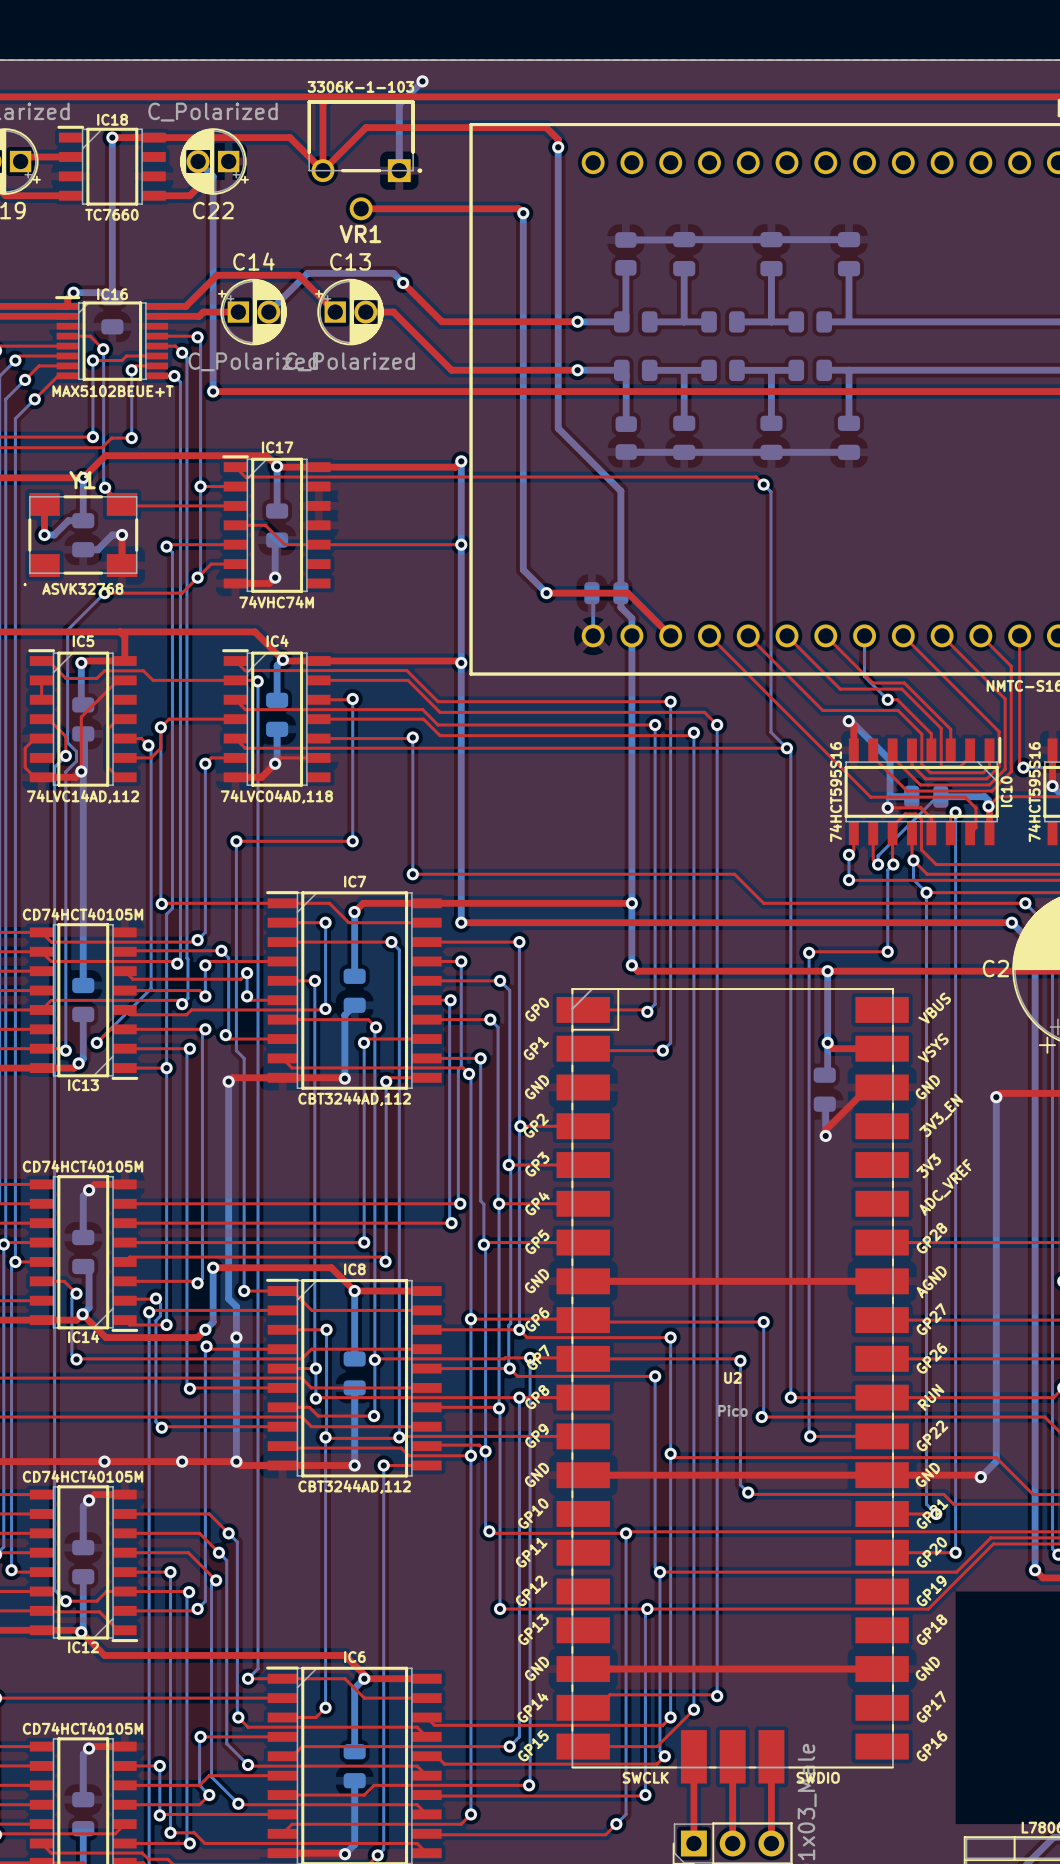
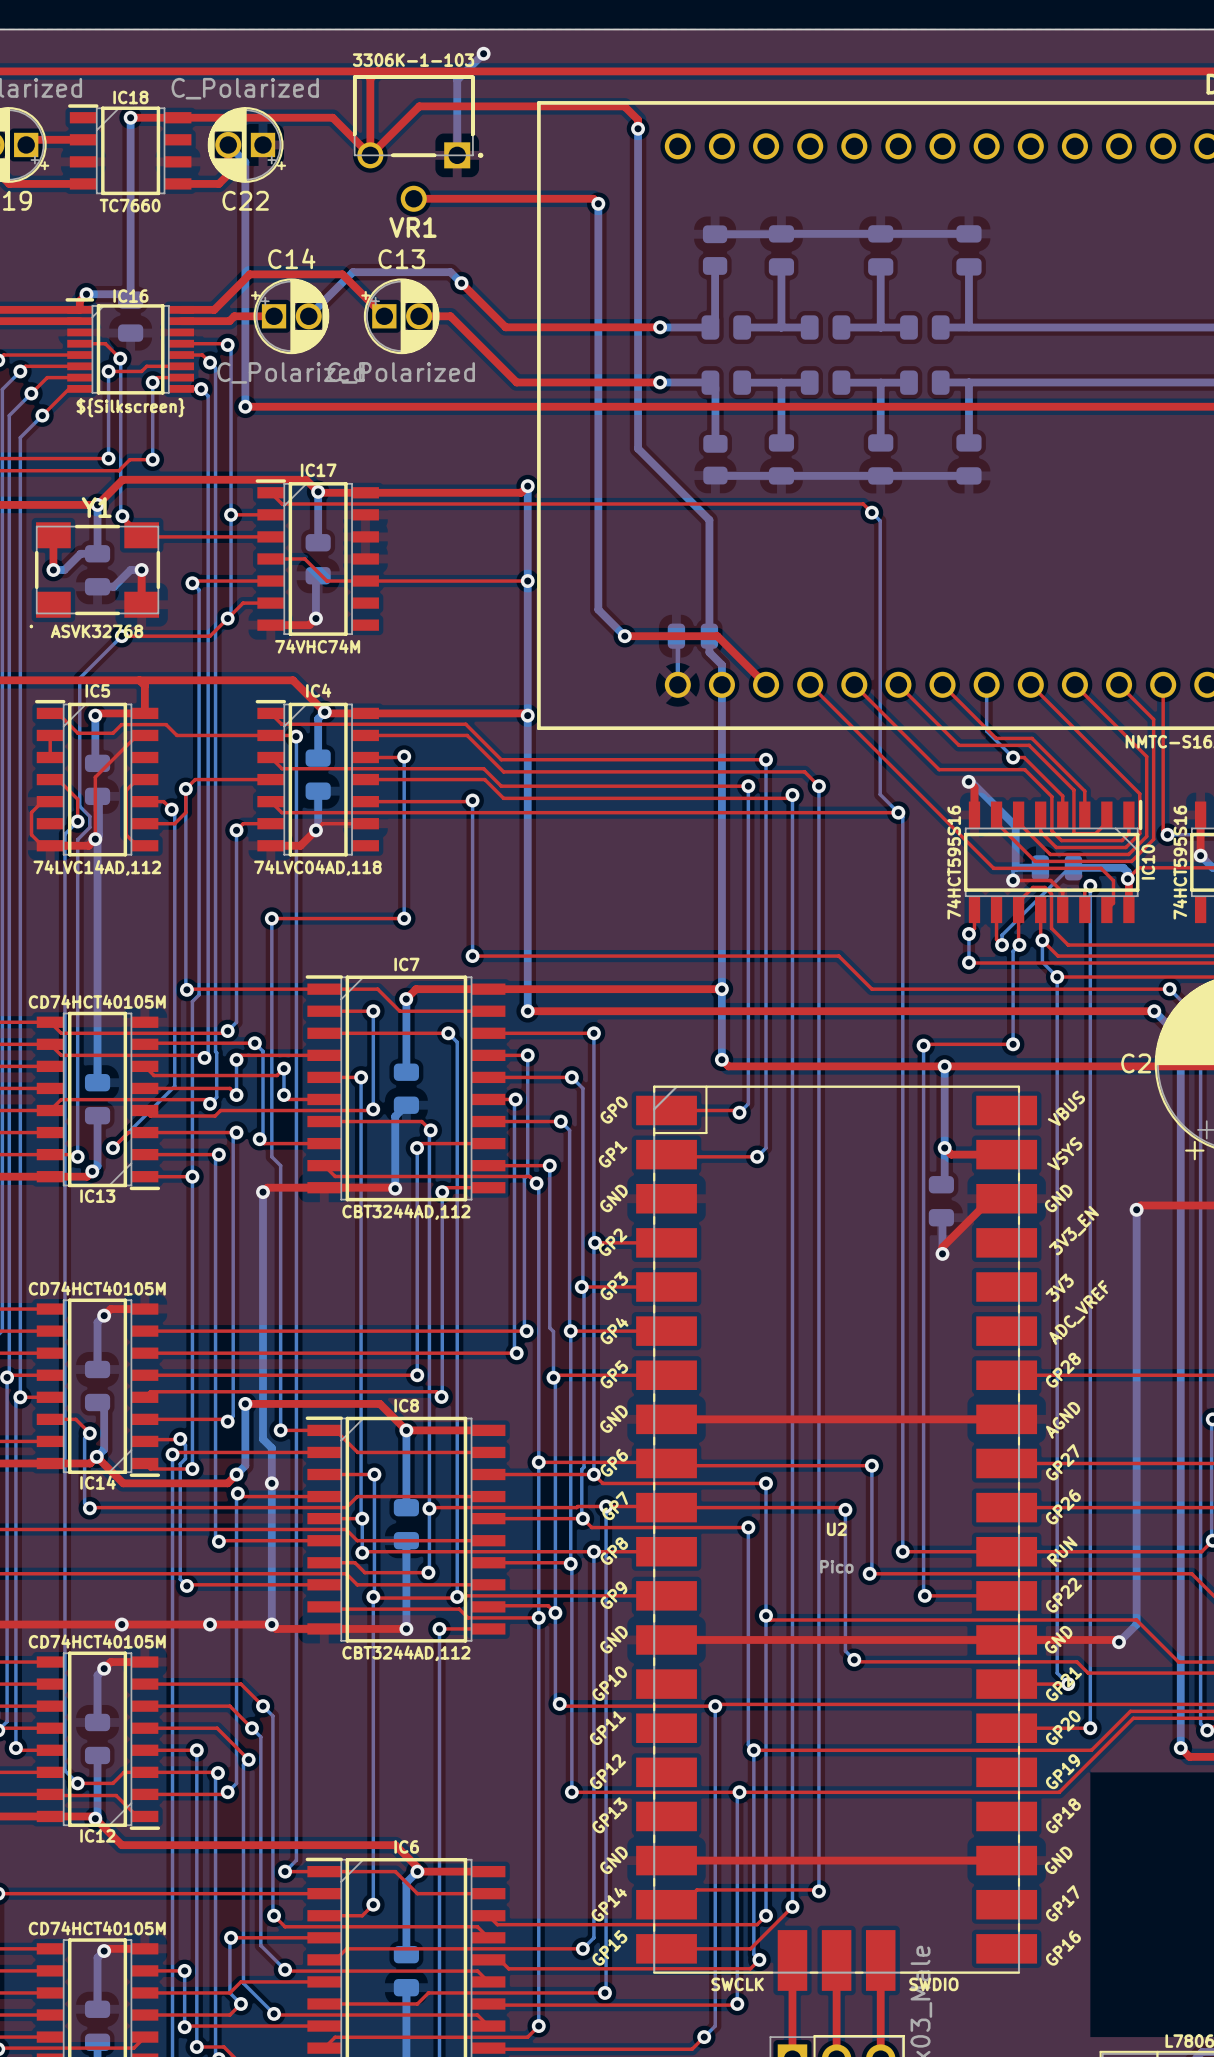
IC16 value: MAX5102BEUE+T (113, 391) -> none
IC16 text: none -> ${Silkscreen} (130, 407)

